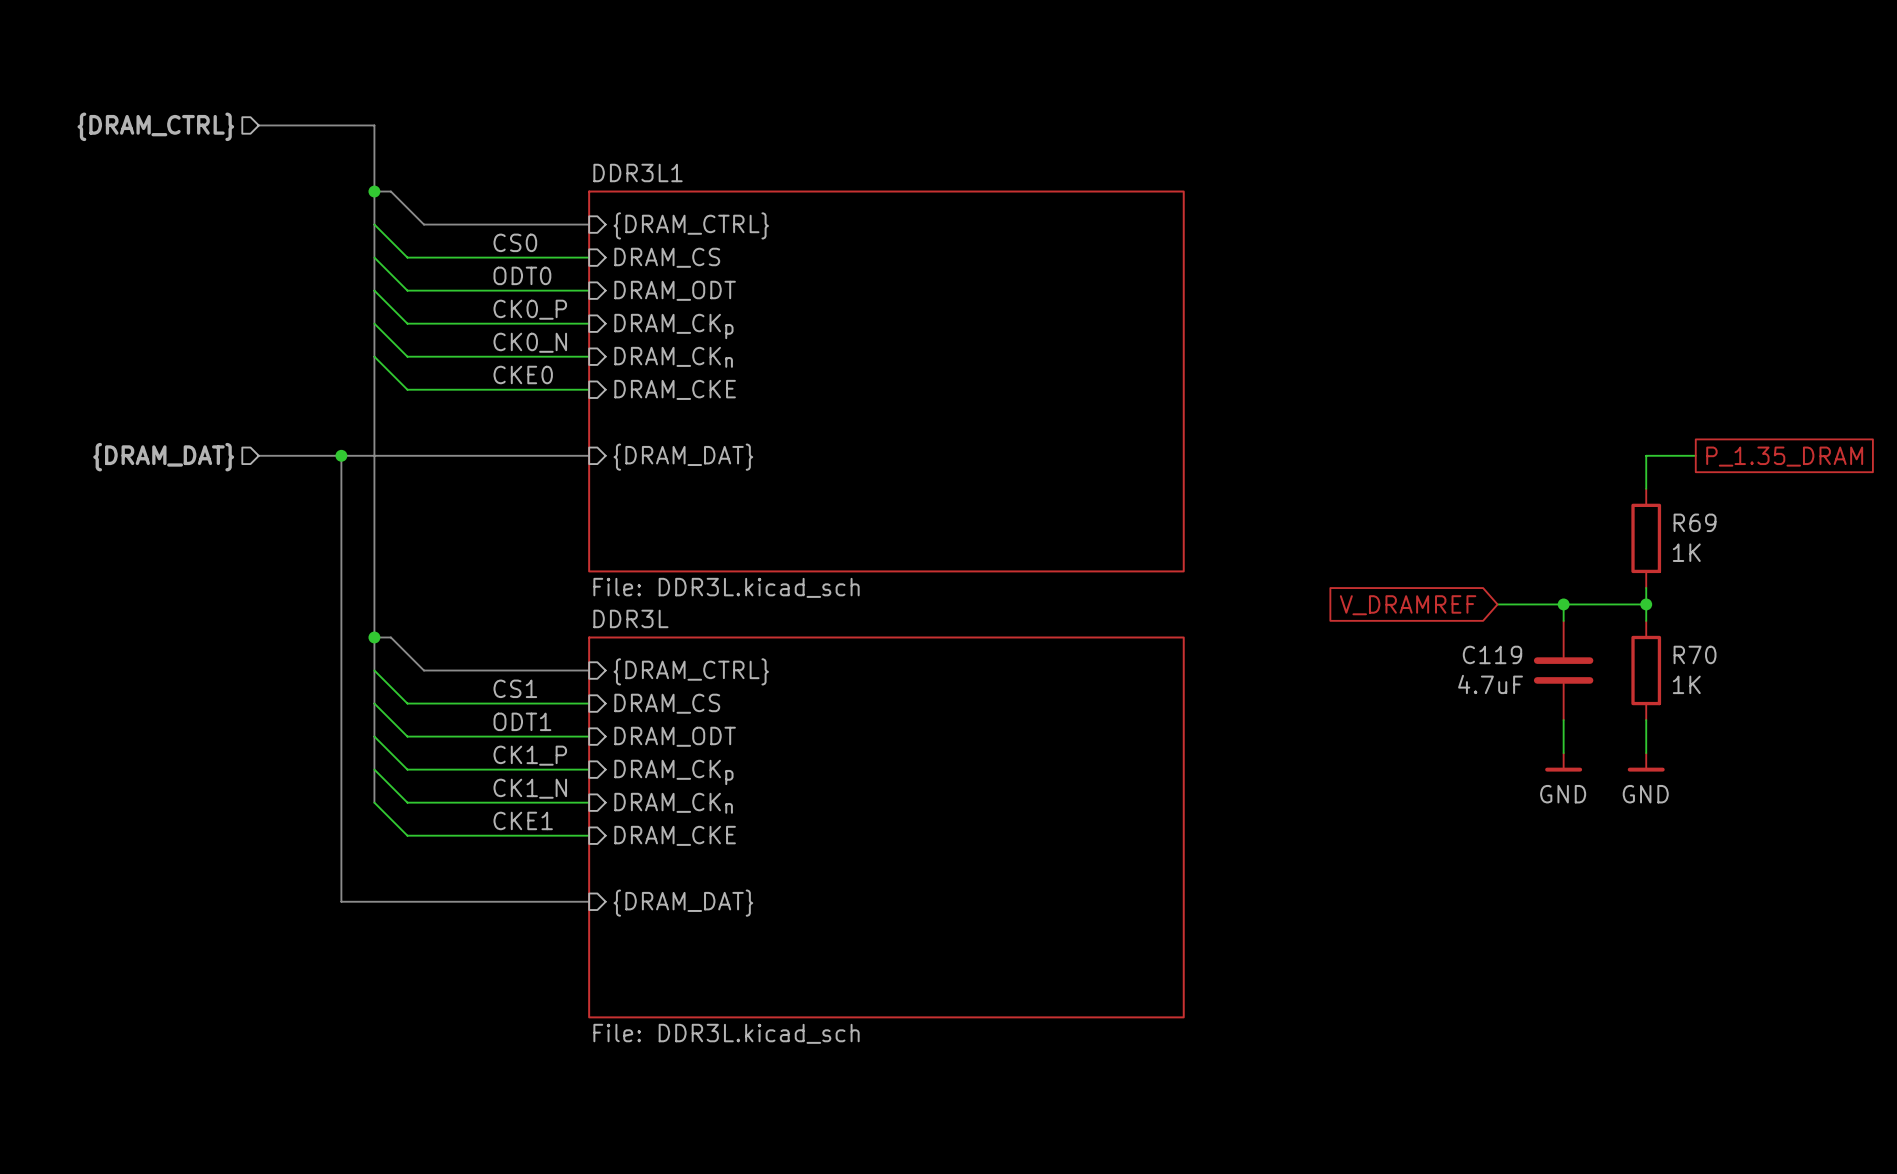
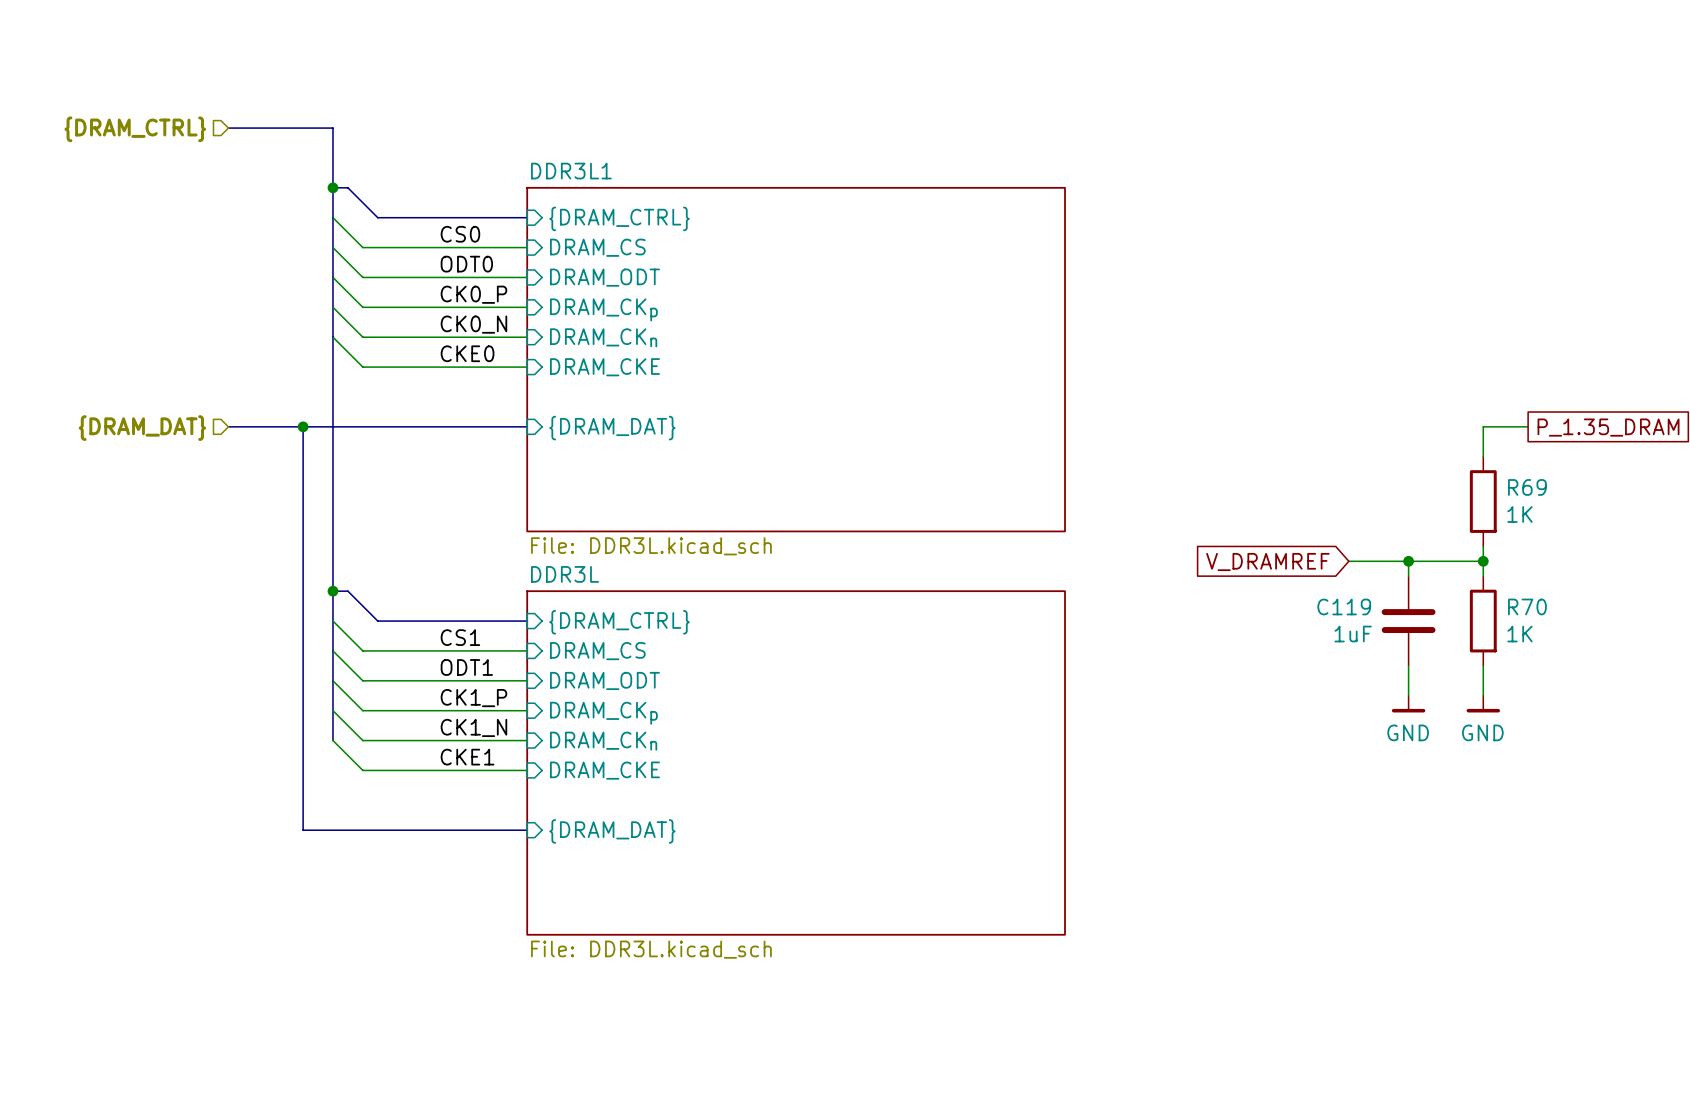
C119 value: 4.7uF (1490, 684) -> 1uF (1353, 634)

